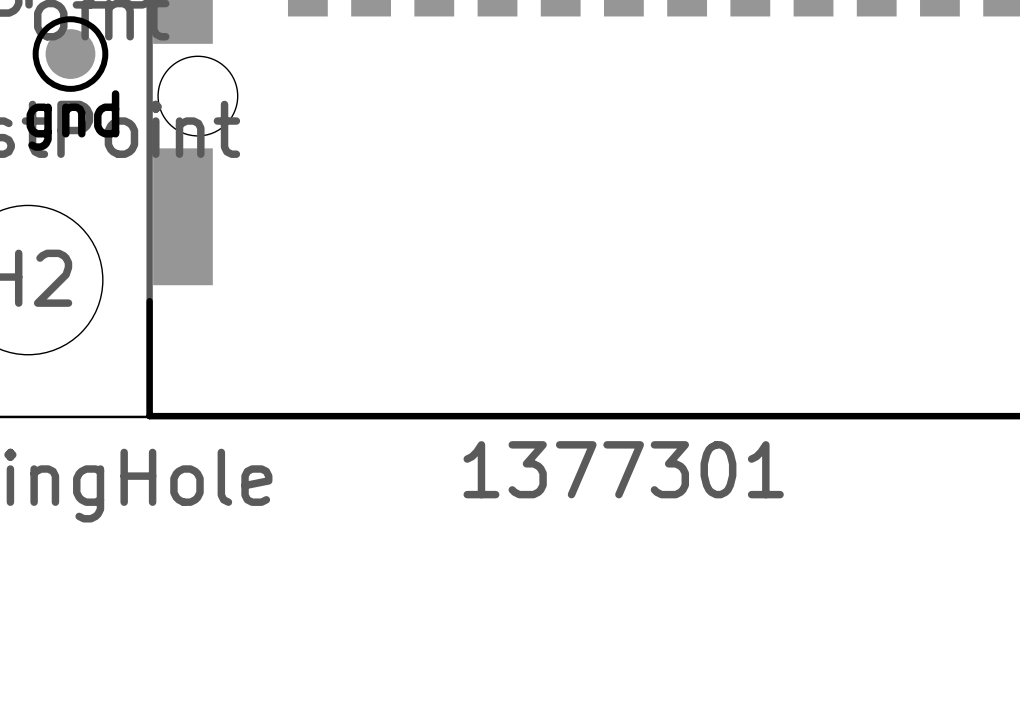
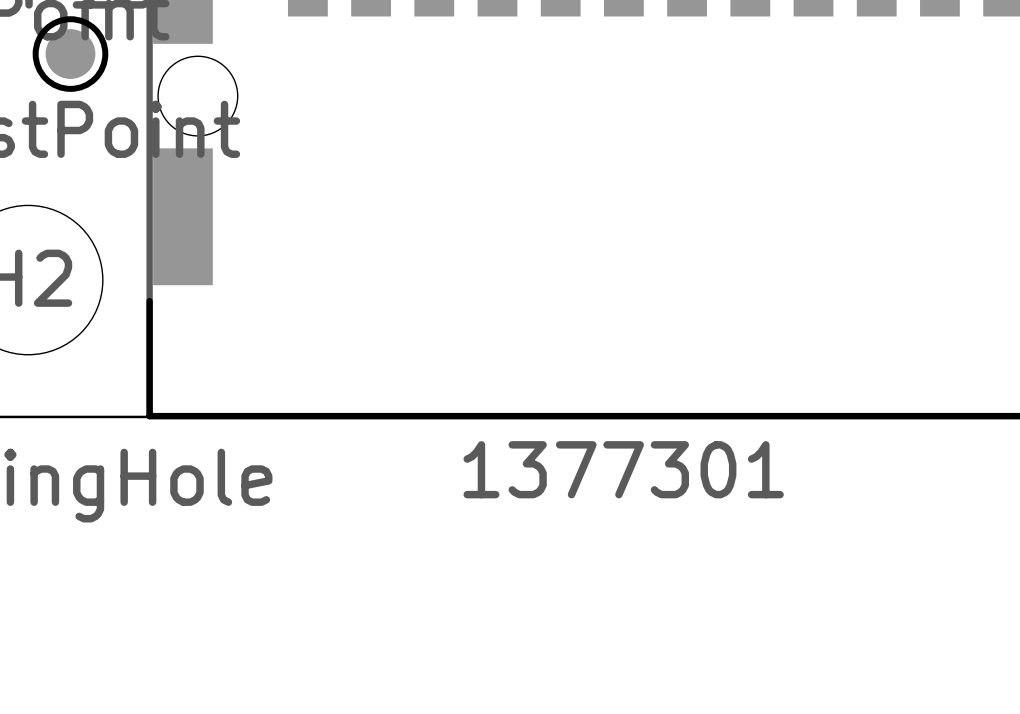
text: gnd (72, 120) -> none

